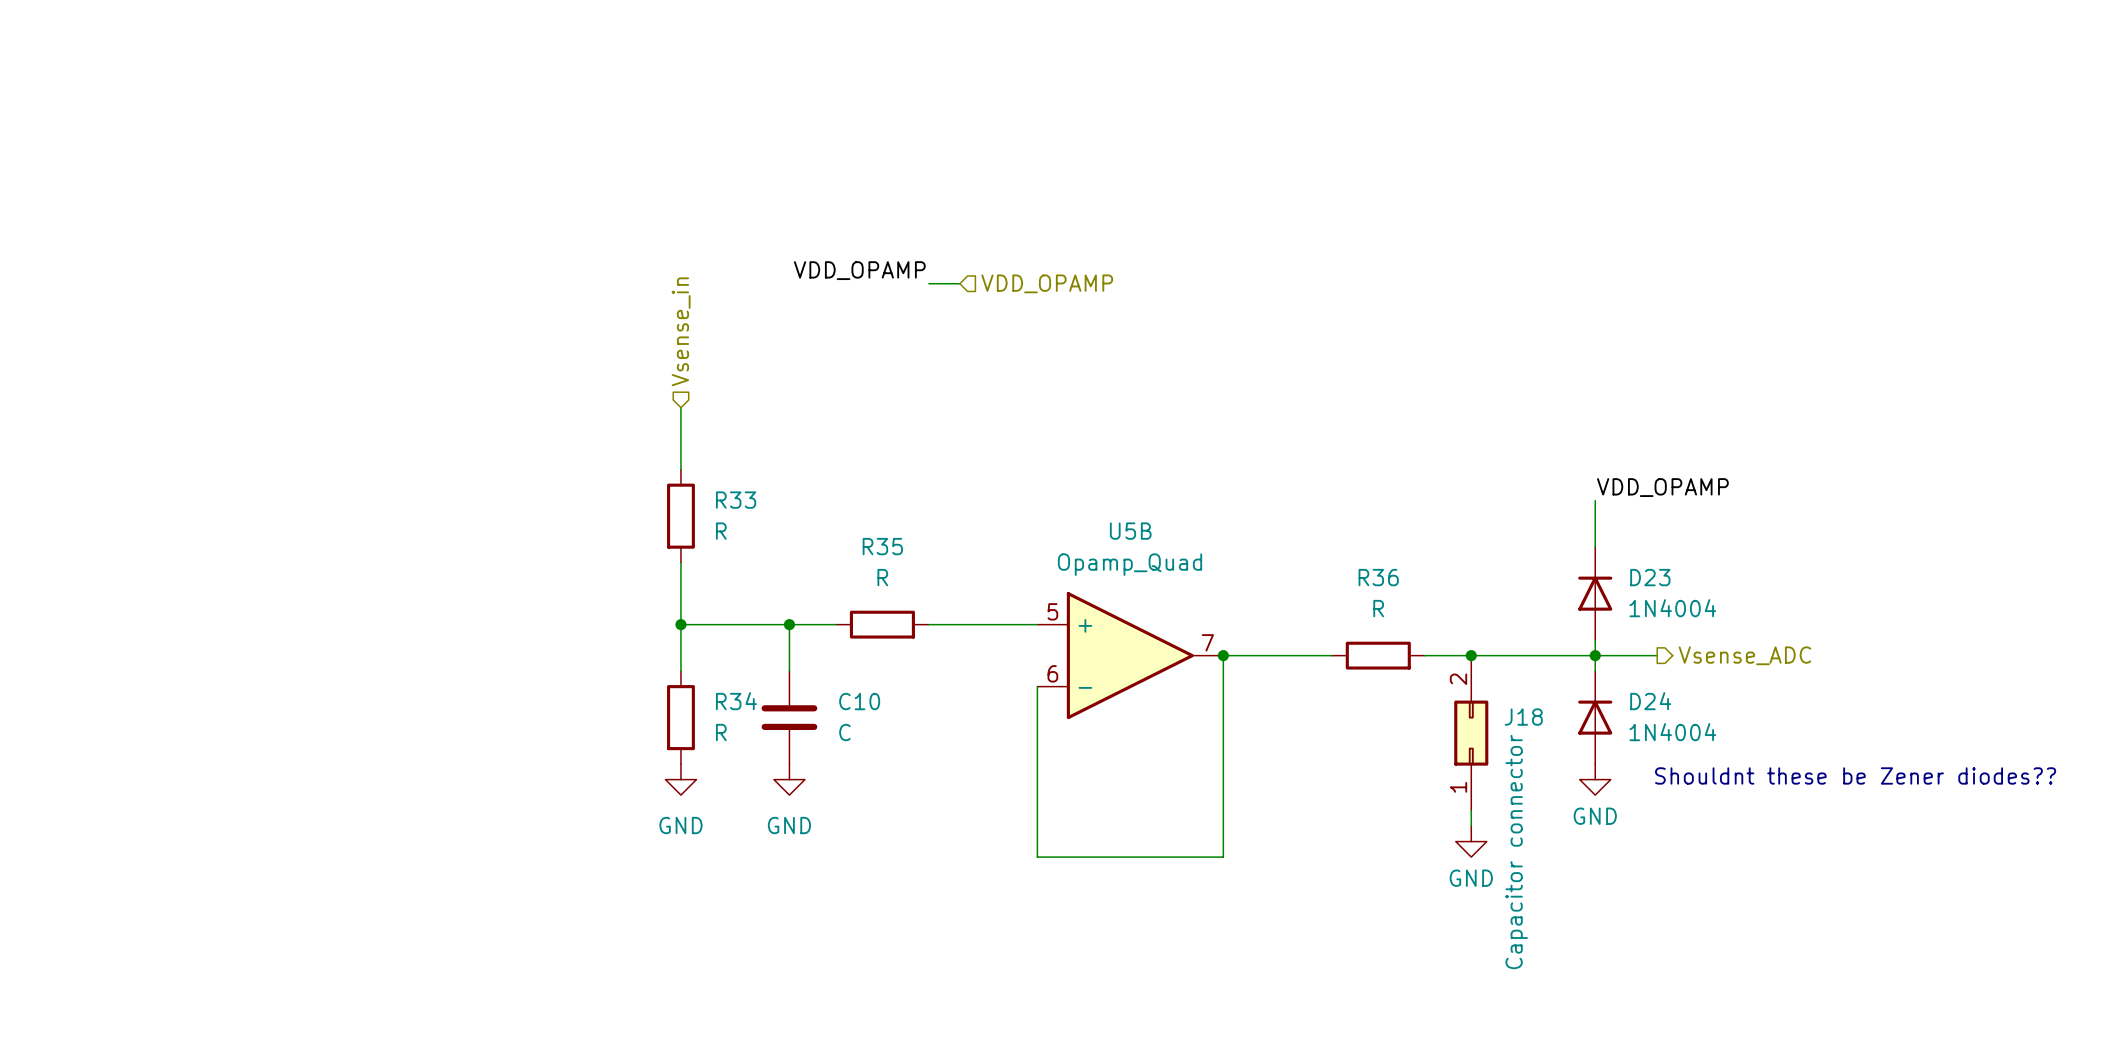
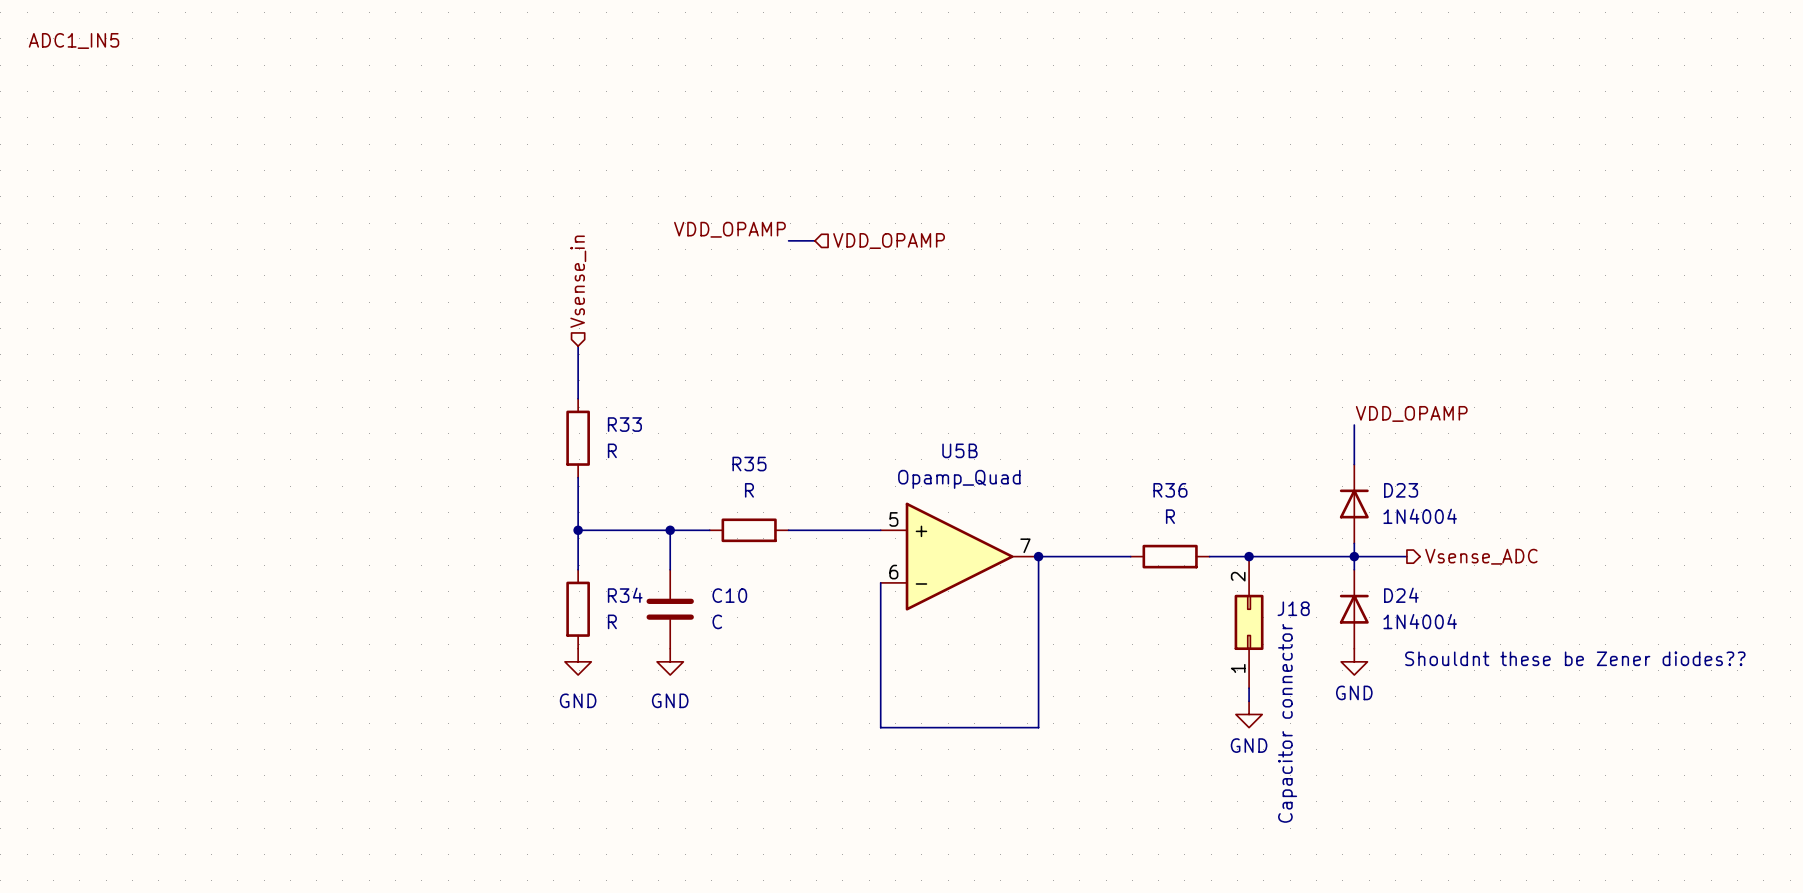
label: none -> ADC1_IN5 (73, 40)

